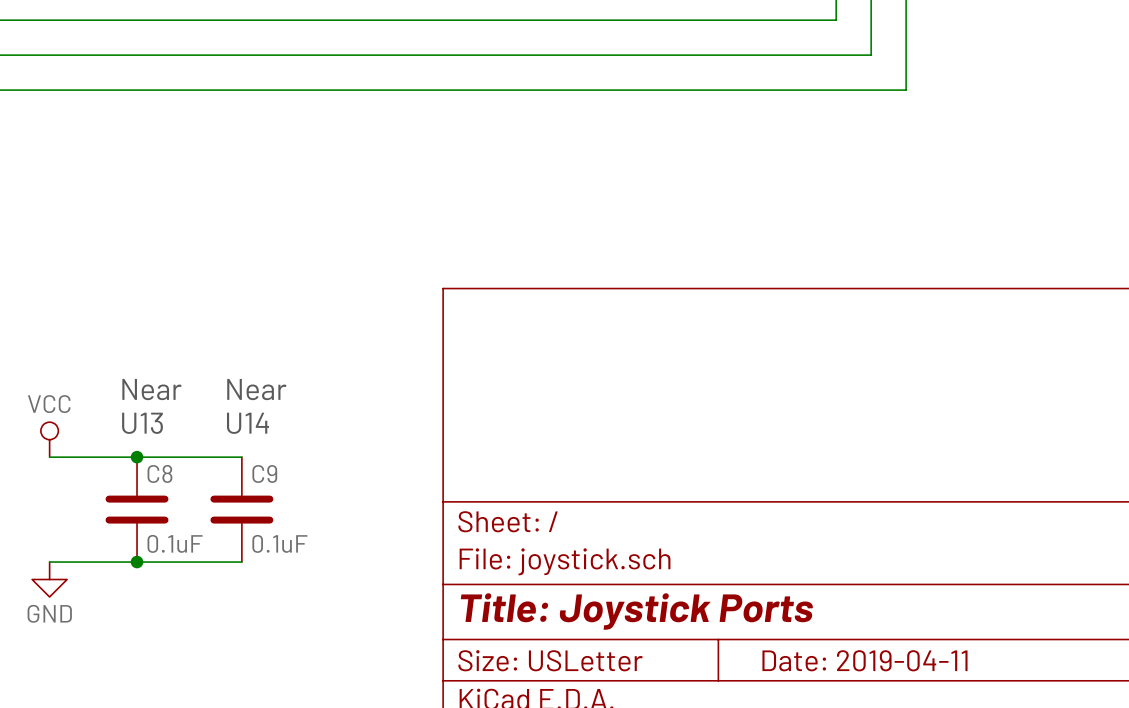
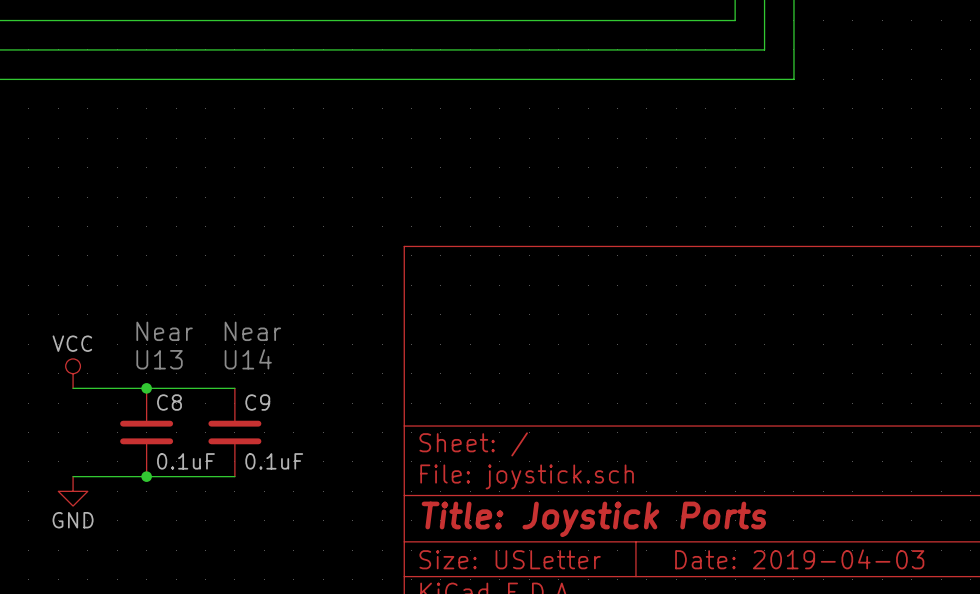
title block: Date: 2019-04-11 (864, 660) -> Date: 2019-04-03 (799, 559)

